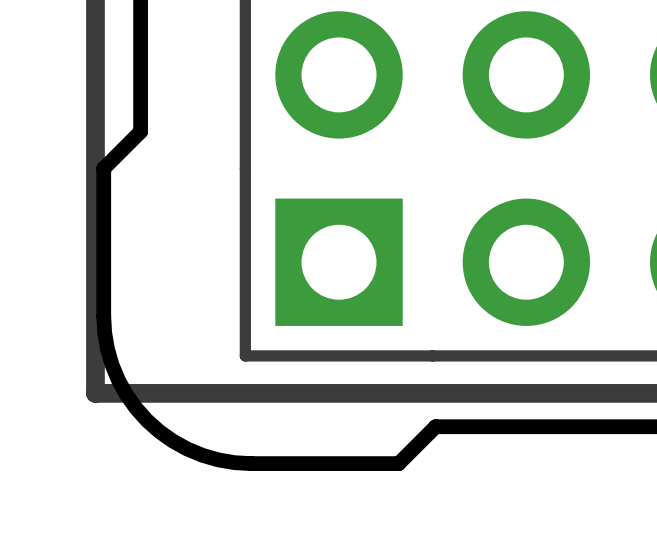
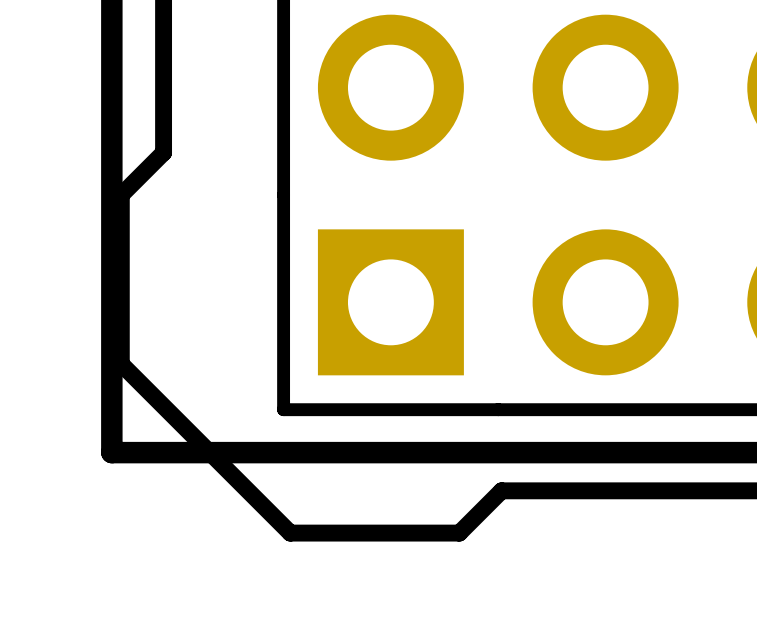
board edge: (103, 316) (107, 348) (118, 380) (135, 408) (146, 420) (159, 431) (187, 448) (218, 459) (251, 463) -> (121, 364) (290, 533)

